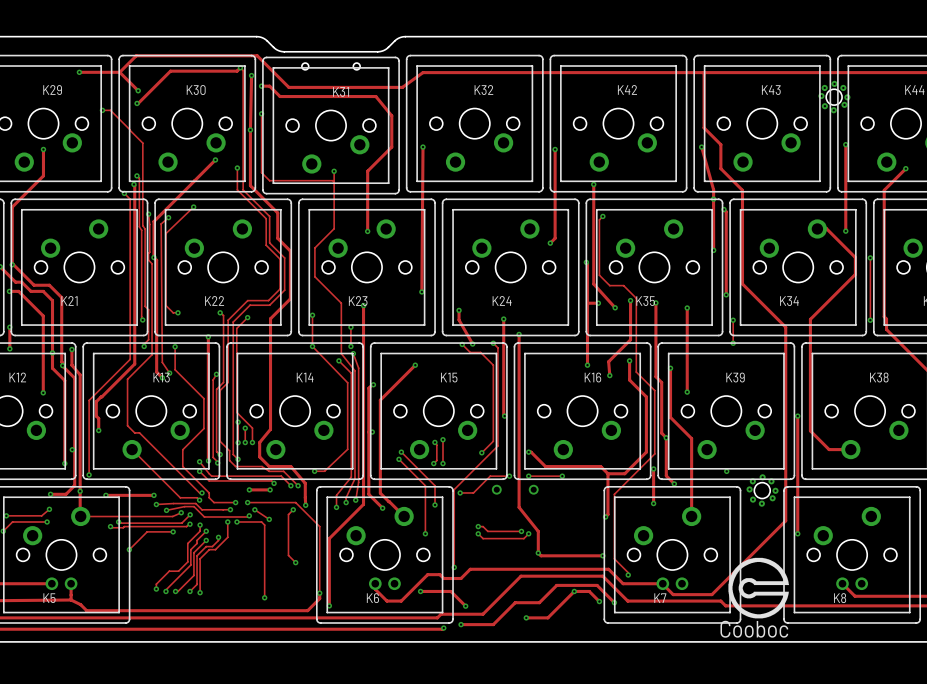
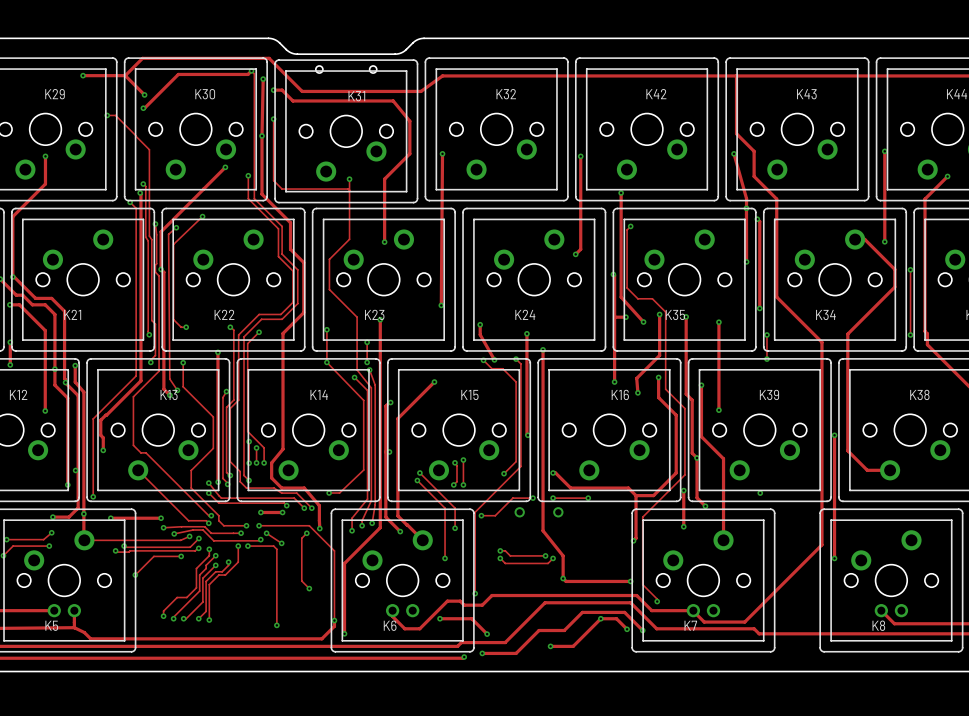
part: (834, 97) -> none
part: (762, 490) -> none
drawing: [728, 557, 789, 619] -> none

